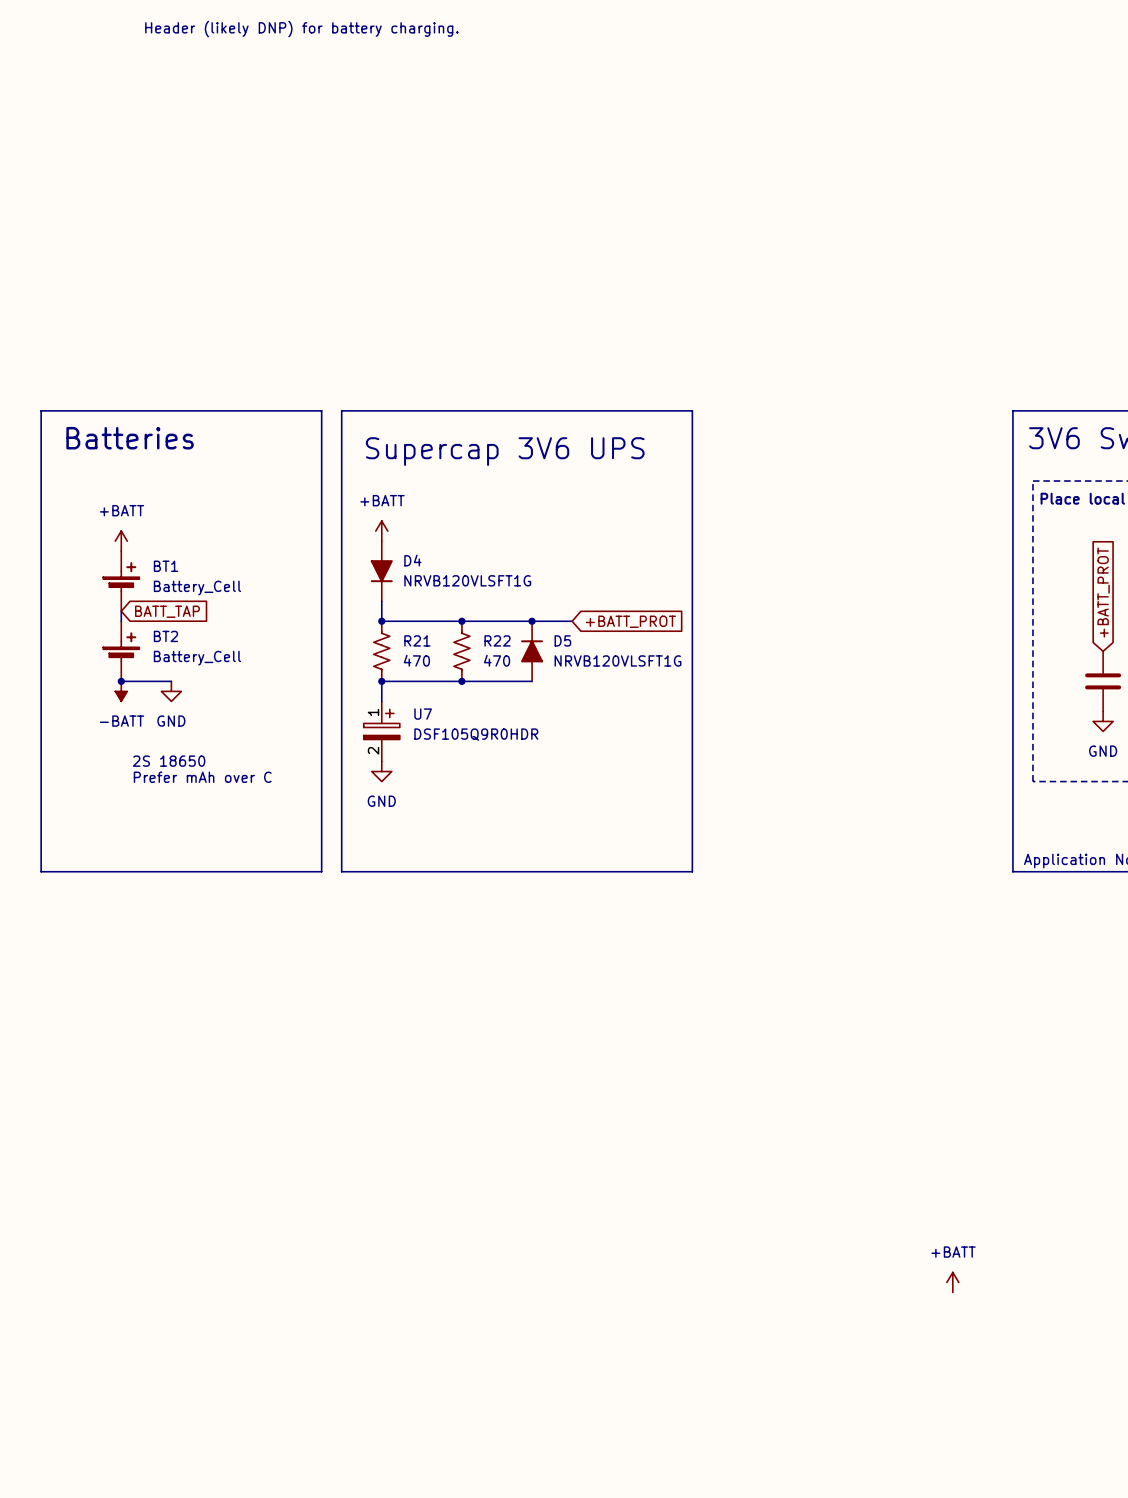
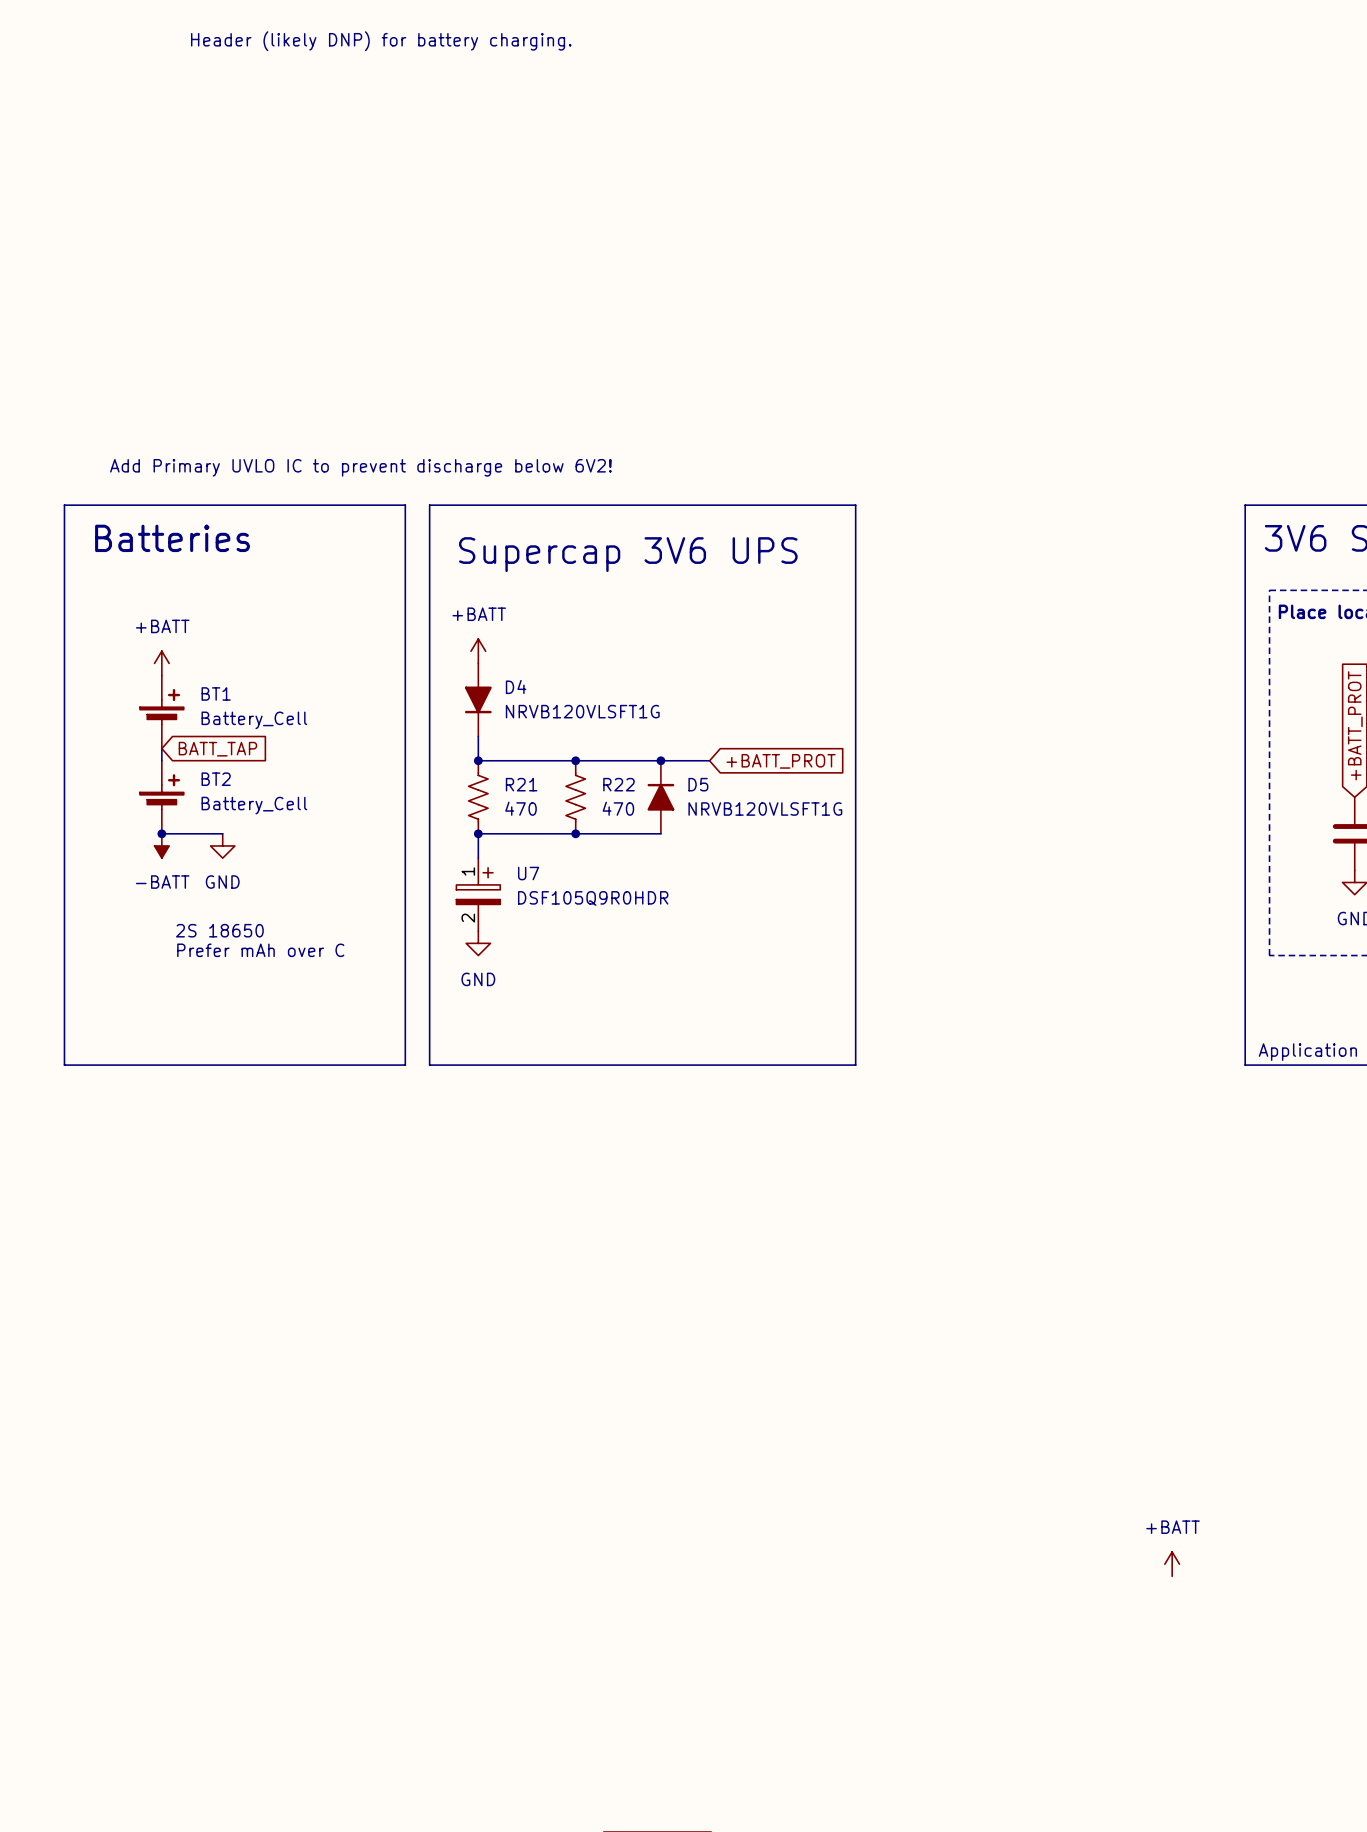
text: none -> Add Primary UVLO IC to prevent discharge below 6V2! (360, 467)

